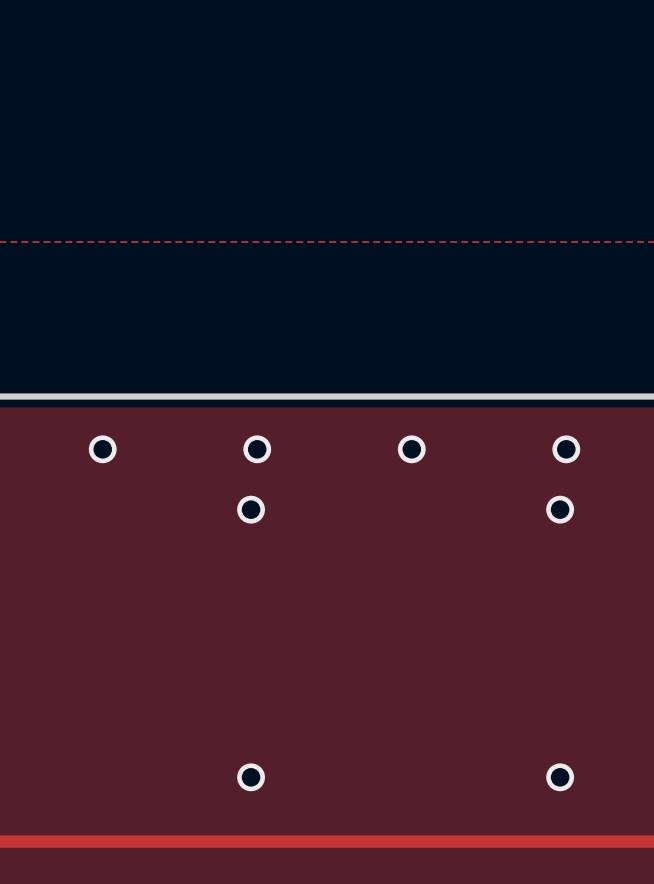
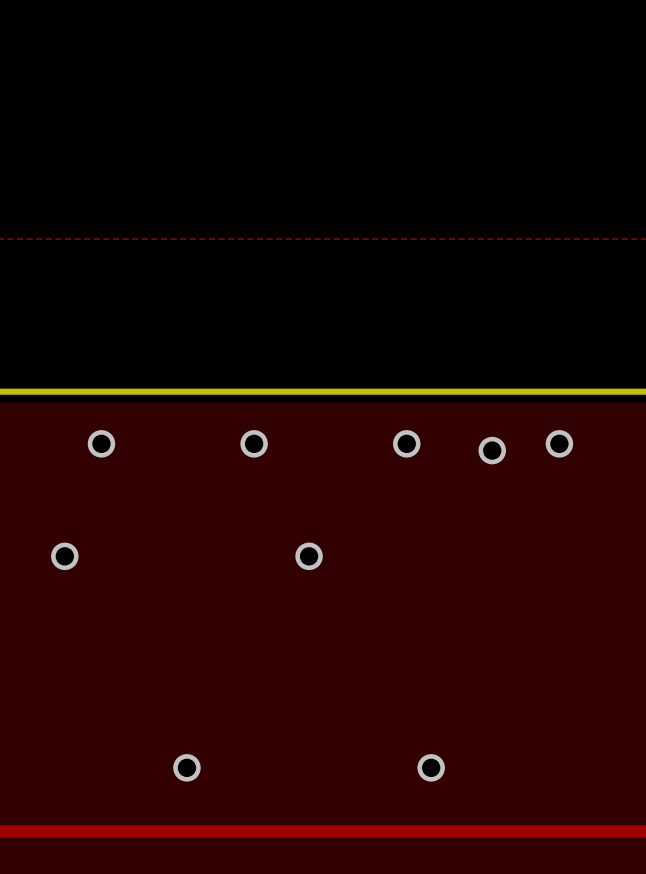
via position: (251, 509) -> (309, 556)
via position: (560, 509) -> (492, 450)
via: none -> (64, 556)
via position: (251, 777) -> (186, 767)
via: none -> (431, 767)
via: (560, 777) -> none

